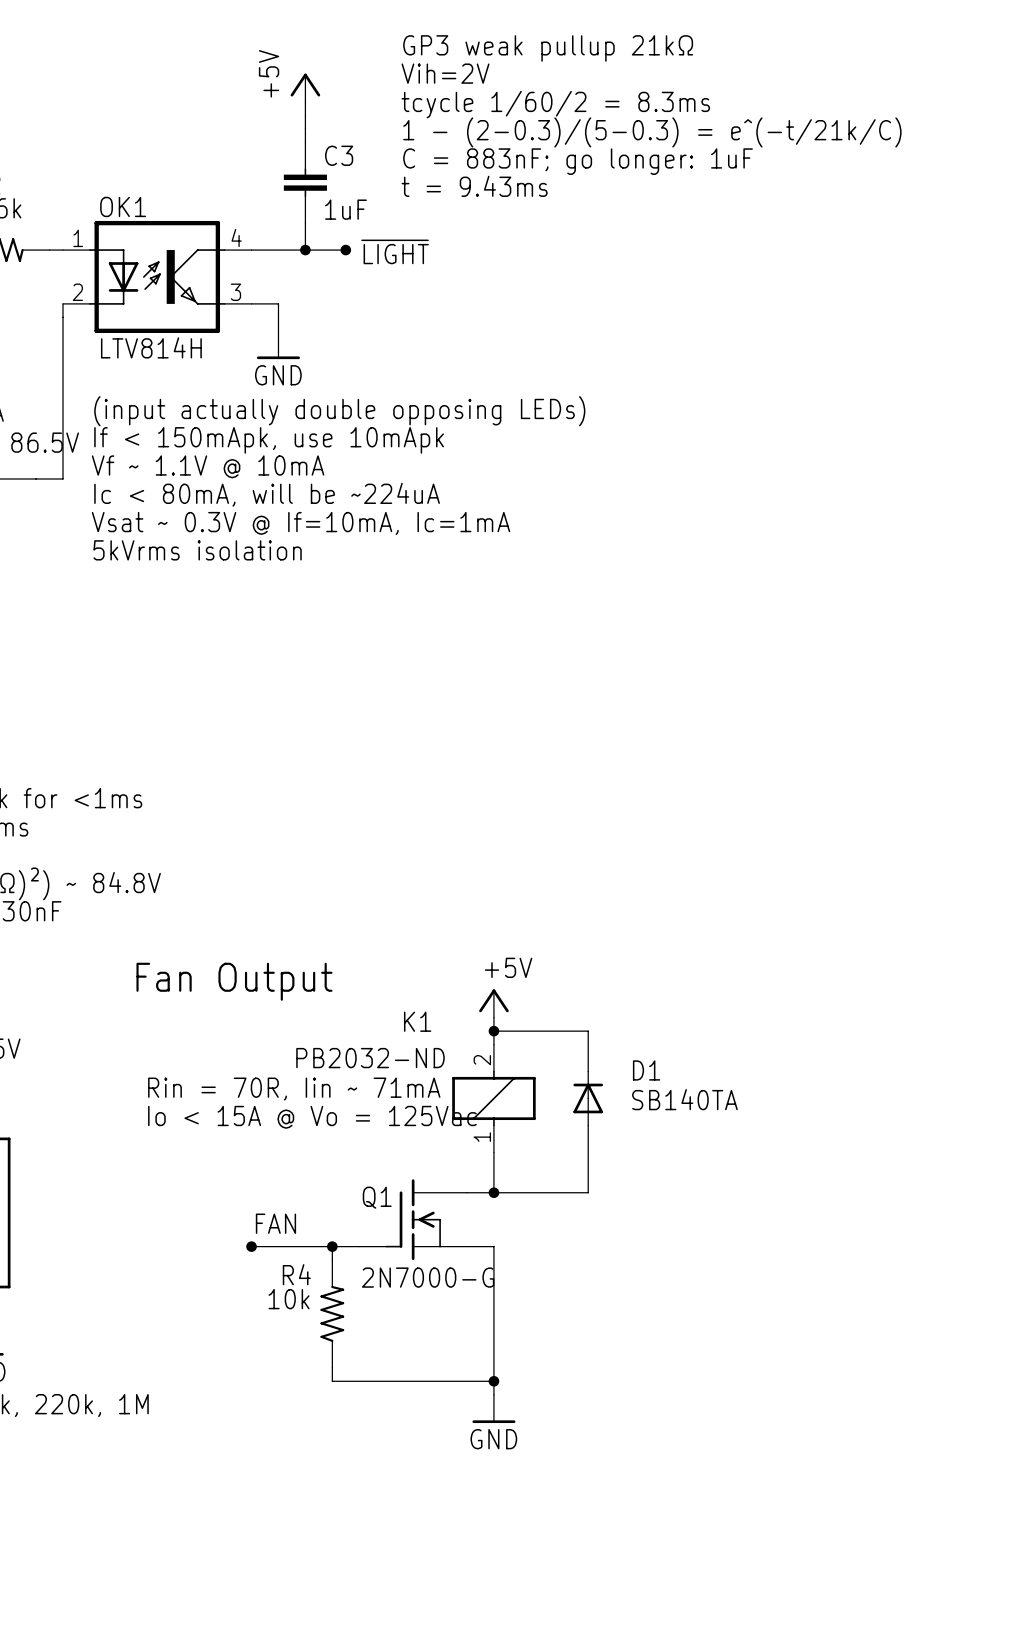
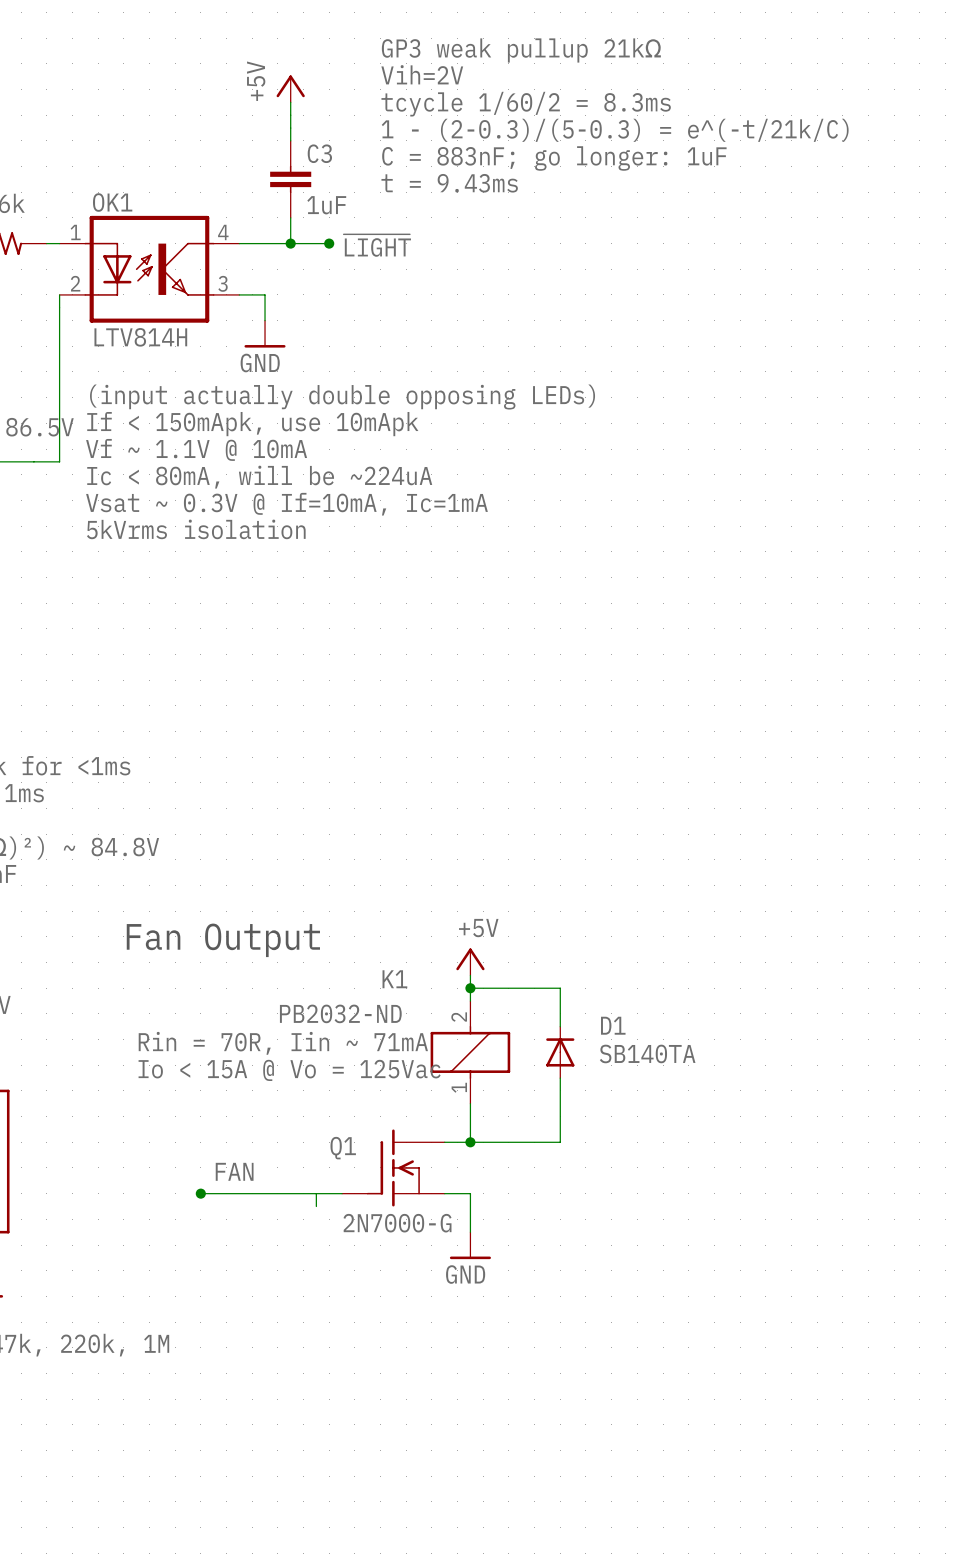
Q1 name position: Q1 (377, 1197) -> Q1 (343, 1148)
label position: FAN (275, 1223) -> FAN (234, 1171)
wire: none -> (200, 1193) (239, 1193)
junction position: (251, 1246) -> (200, 1193)
junction: (332, 1246) -> none
wire: (493, 1287) (493, 1394) -> none
R4: 10k (332, 1313) -> none
wire: (332, 1367) (332, 1381) (493, 1381) -> none
junction: (493, 1381) -> none
power symbol position: GND (493, 1408) -> GND (470, 1245)

